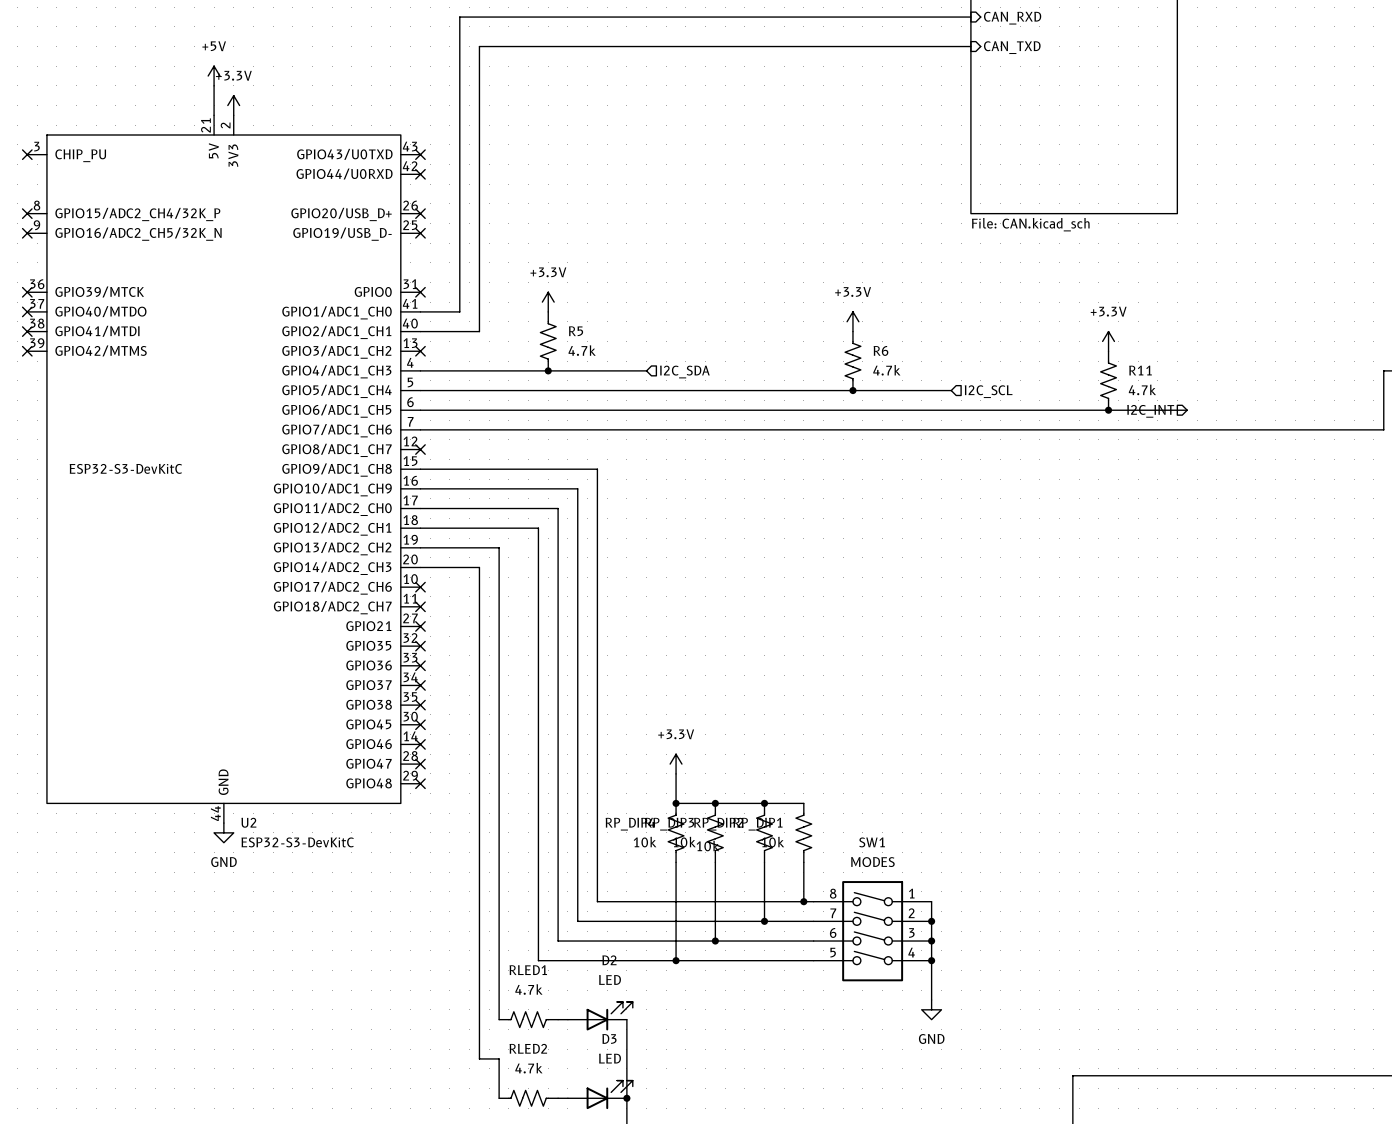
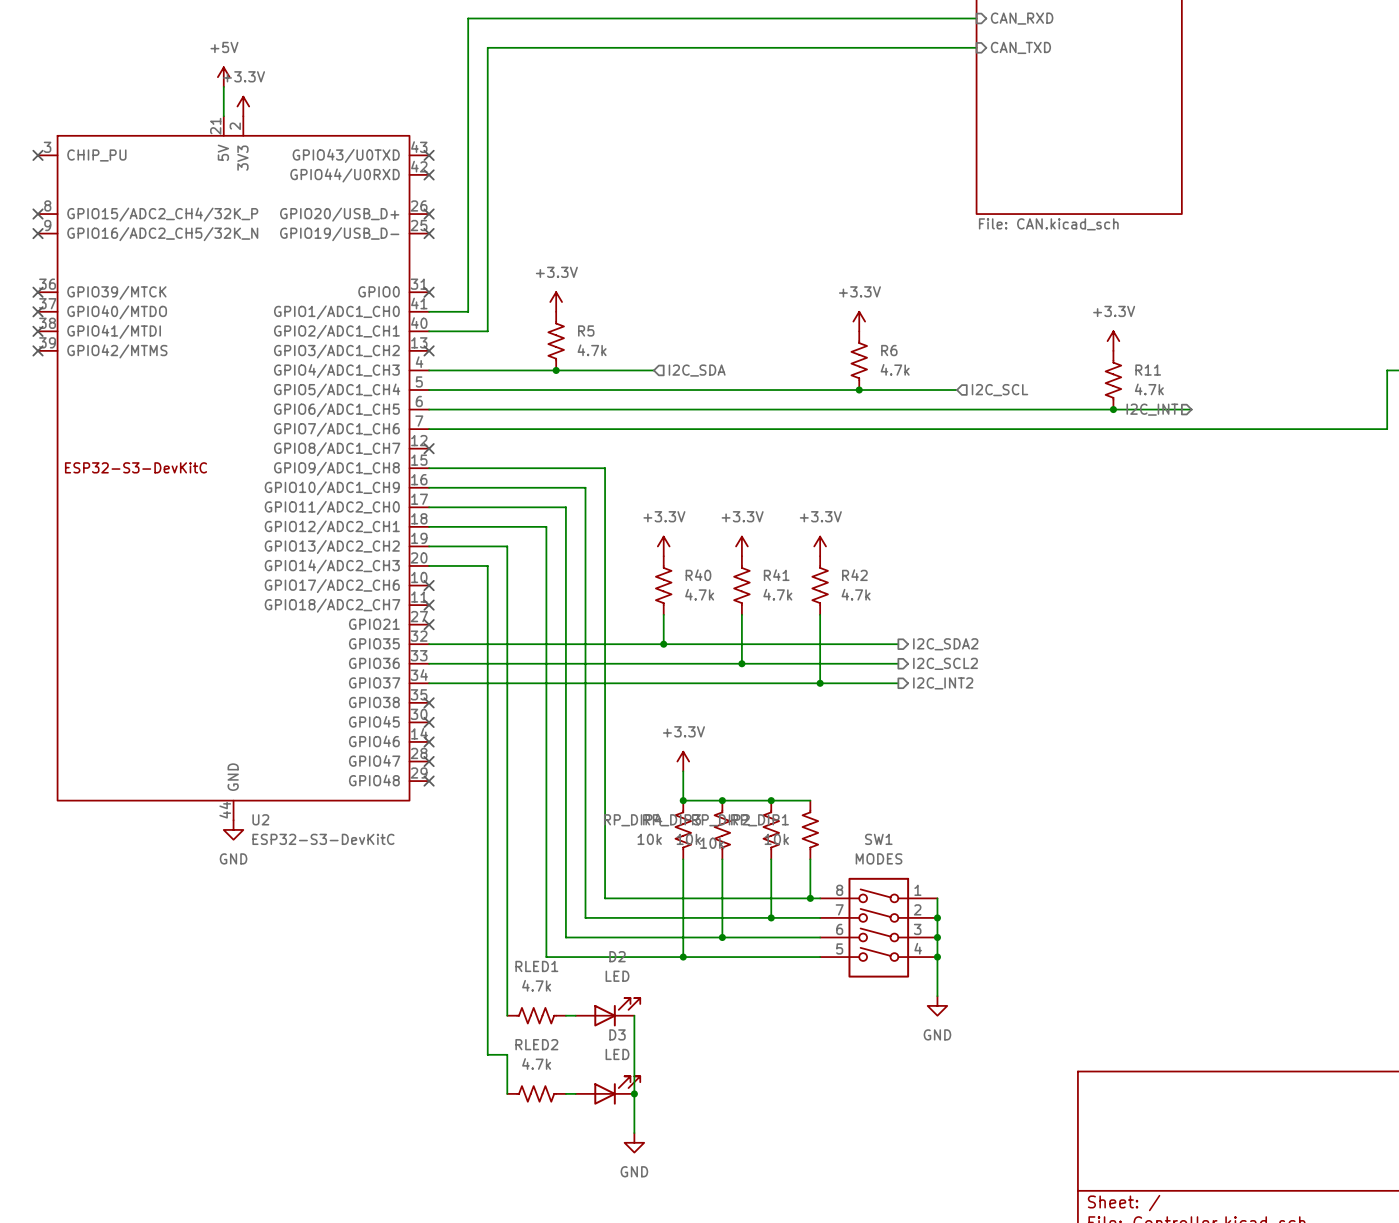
power symbol: none -> +3.3V (663, 546)
power symbol: none -> +3.3V (741, 546)
power symbol: none -> +3.3V (820, 546)
R40: none -> 4.7k (663, 585)
R41: none -> 4.7k (741, 585)
R42: none -> 4.7k (820, 585)
wire: none -> (663, 614) (663, 644)
wire: none -> (741, 614) (741, 663)
wire: none -> (820, 614) (820, 683)
wire: none -> (429, 644) (898, 644)
no-connect mark: (420, 646) -> none
junction: none -> (663, 644)
hierarchical label: none -> I2C_SDA2 (945, 644)
wire: none -> (429, 663) (898, 663)
no-connect mark: (420, 665) -> none
junction: none -> (741, 663)
hierarchical label: none -> I2C_SCL2 (945, 663)
wire: none -> (429, 683) (898, 683)
no-connect mark: (420, 685) -> none
junction: none -> (820, 683)
hierarchical label: none -> I2C_INT2 (943, 683)

